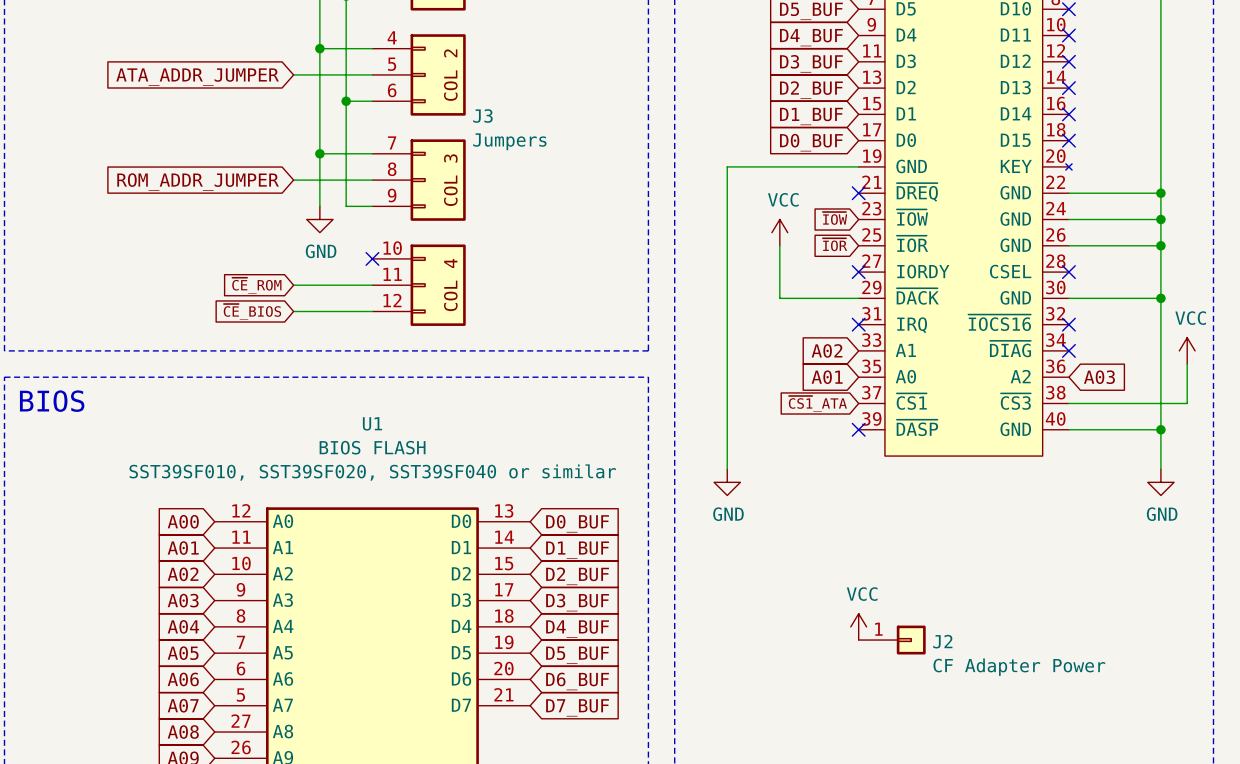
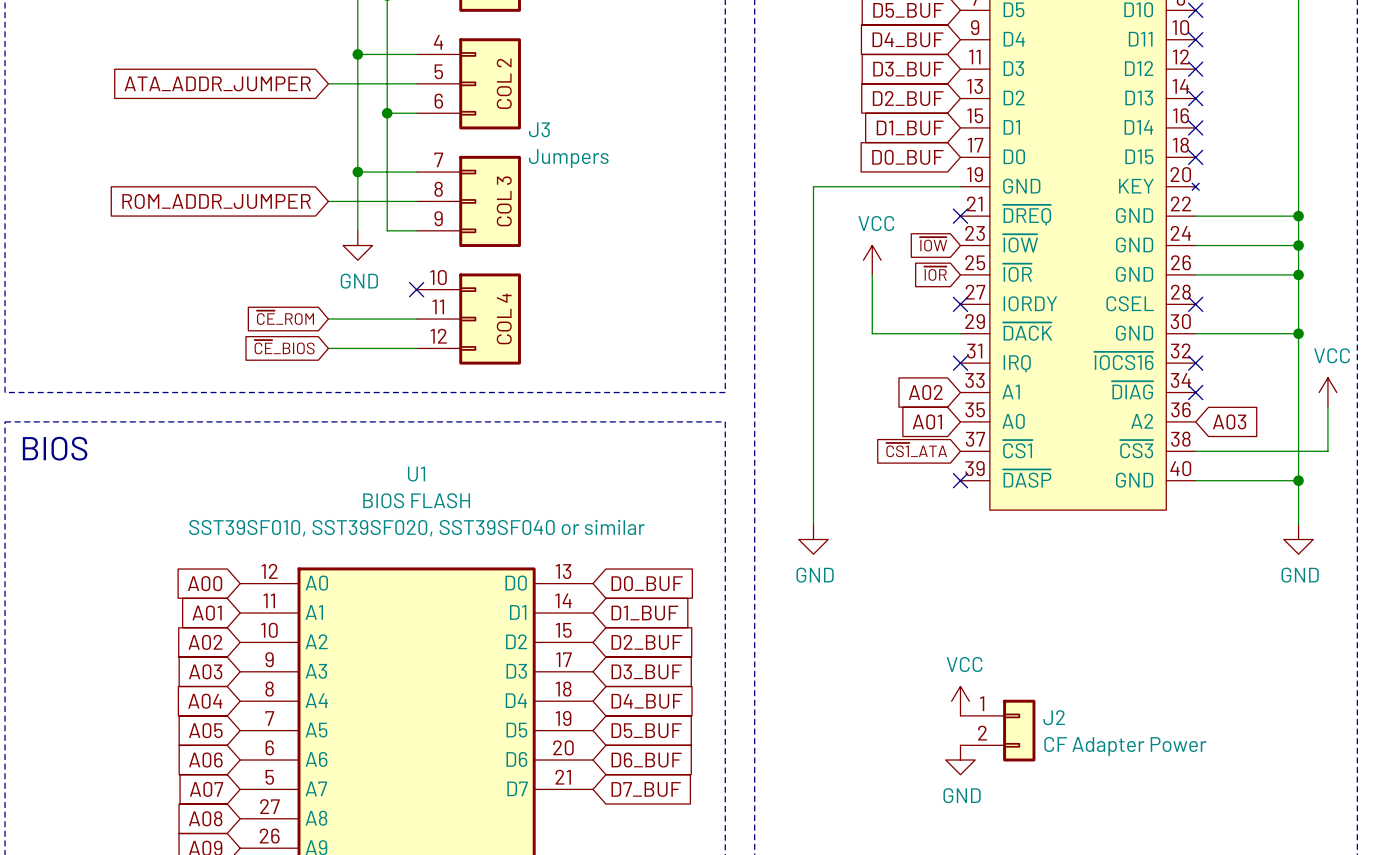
J2 symbol: [858, 625, 926, 655] -> [960, 699, 1036, 762]
power symbol: none -> GND (960, 760)

